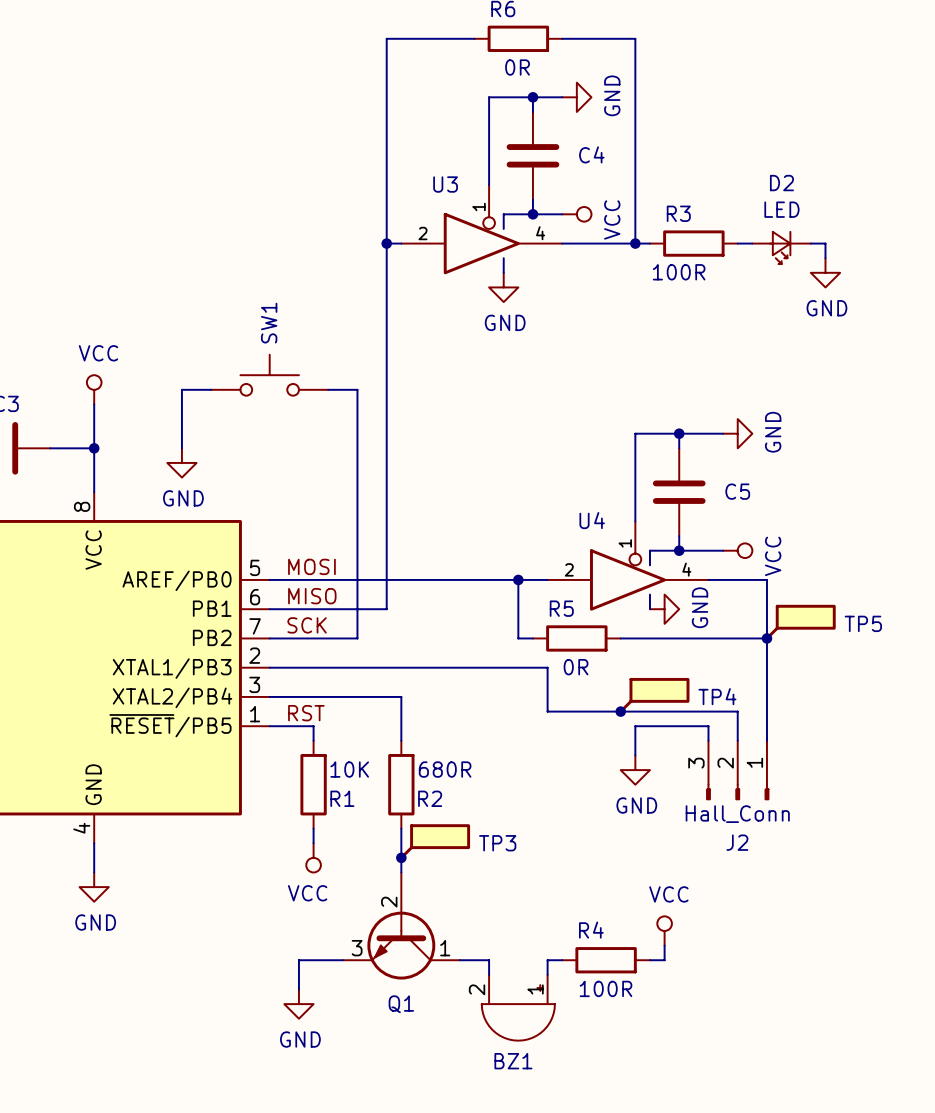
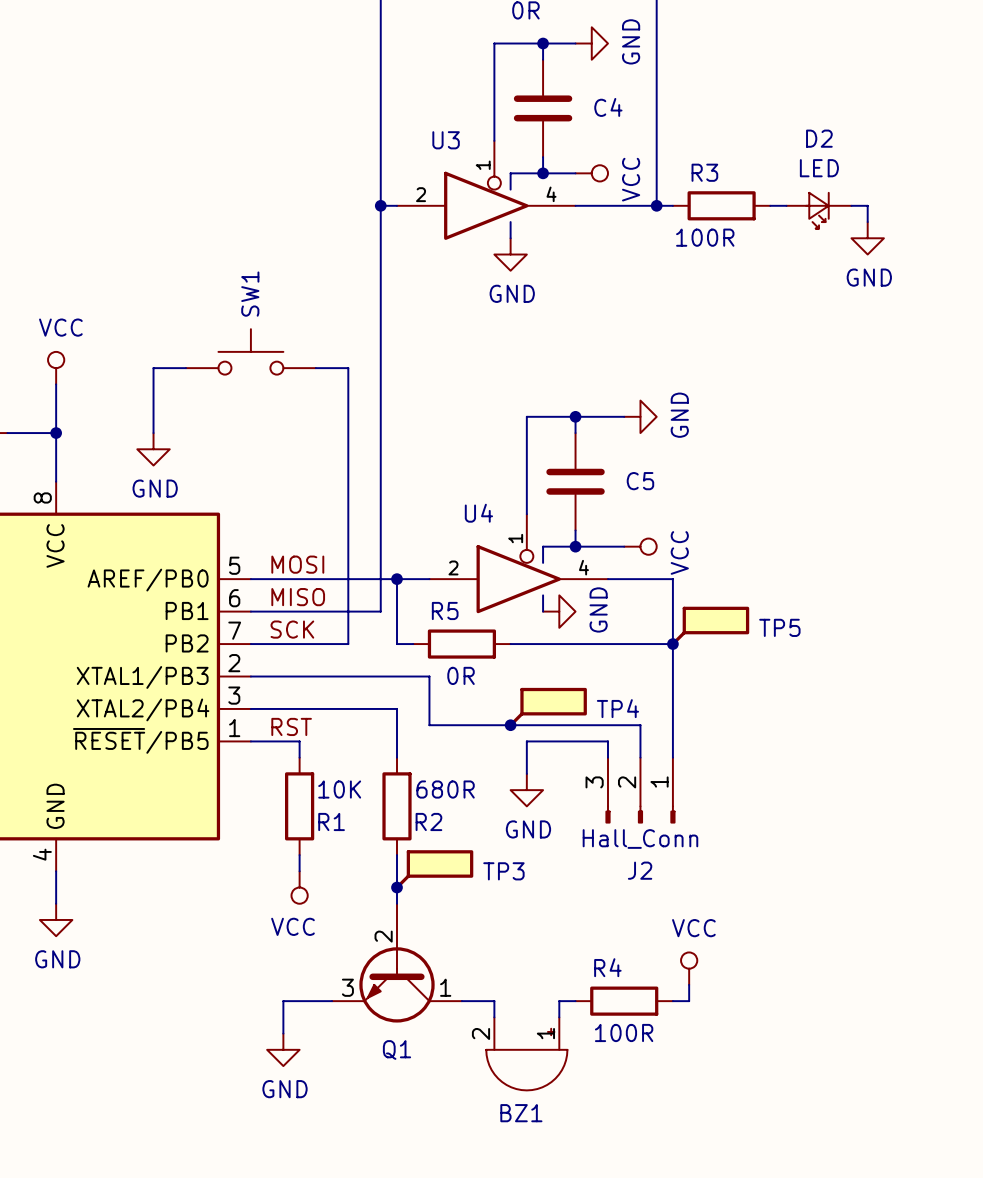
junction: none -> (575, 416)
power symbol: none -> GND (640, 416)
wire: (679, 433) (679, 448) -> (575, 416) (575, 433)
junction: (679, 433) -> none
wire: (723, 433) (635, 433) (635, 521) -> (624, 416) (526, 416) (526, 514)
power symbol: GND (737, 433) -> none
C5 position: (679, 492) -> (575, 481)
wire: (679, 536) (679, 550) -> (575, 530) (575, 546)
junction: (679, 550) -> none
wire: (723, 550) (649, 550) (649, 565) -> (624, 546) (543, 546) (543, 562)
power symbol position: VCC (737, 550) -> VCC (640, 546)
U4 position: (628, 566) -> (518, 563)
wire: none -> (396, 579) (396, 644) (413, 644)
junction: none -> (396, 579)
wire: (430, 579) (547, 579) -> none
wire: (518, 579) (518, 638) -> (510, 644) (526, 644)
junction position: (518, 579) -> (575, 546)
wire: none -> (608, 579) (672, 579) (672, 595)
wire: (708, 579) (766, 579) (766, 740) -> none
wire: none -> (543, 595) (543, 611)
power symbol: none -> GND (559, 611)
wire: none -> (672, 611) (672, 757)
power symbol: GND (664, 609) -> none
TP5 position: (800, 622) -> (710, 626)
wire: none -> (543, 644) (640, 644)
R5 position: (576, 638) -> (461, 644)
wire: (649, 638) (766, 638) -> none
junction: none -> (672, 644)
junction: (766, 638) -> none
wire: (430, 667) (547, 667) (547, 711) -> (429, 676) (429, 725) (559, 725)
TP4 position: (654, 695) -> (547, 707)
junction: none -> (510, 725)
wire: (620, 711) (737, 711) (737, 740) -> (640, 725) (640, 757)
junction: (620, 711) -> none
wire: (708, 740) (708, 726) (635, 726) (635, 755) -> (608, 757) (608, 741) (526, 741) (526, 773)
power symbol: none -> GND (526, 790)
power symbol: GND (635, 770) -> none
J2 position: (737, 770) -> (640, 790)

